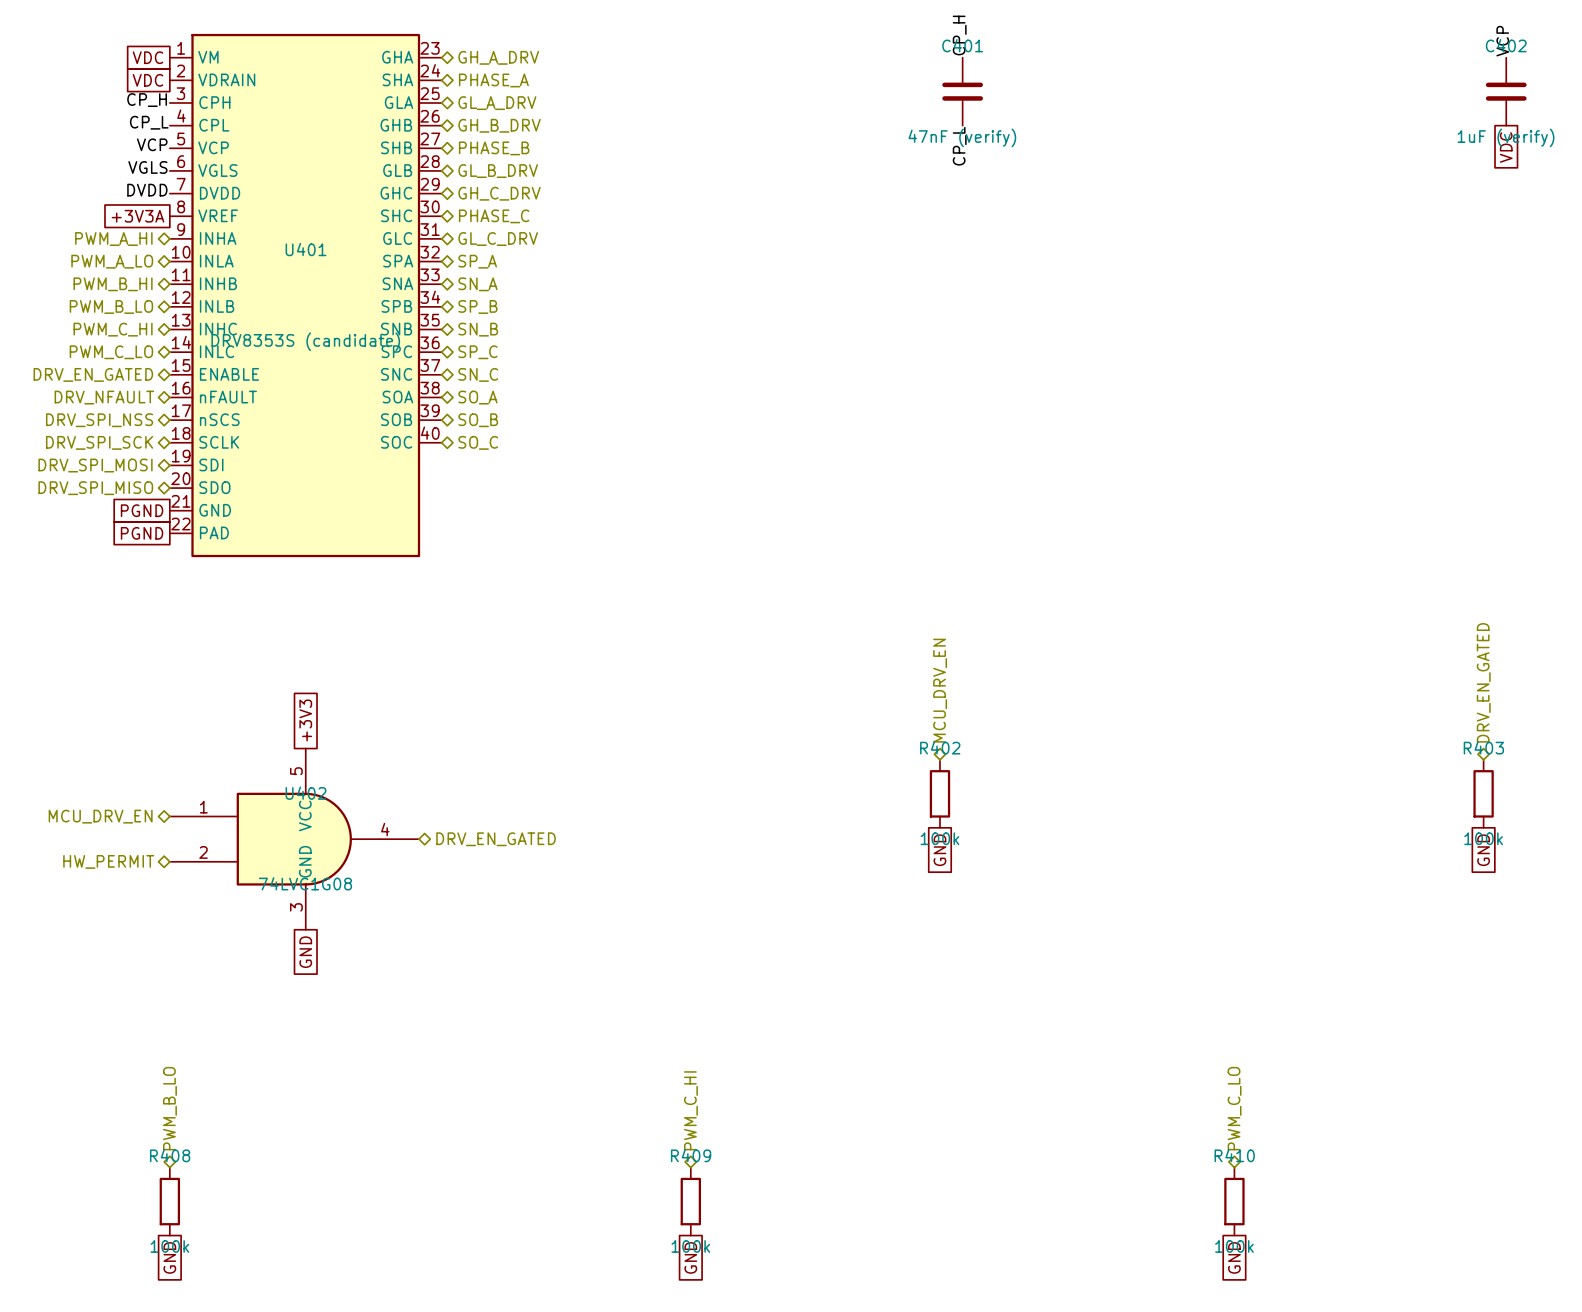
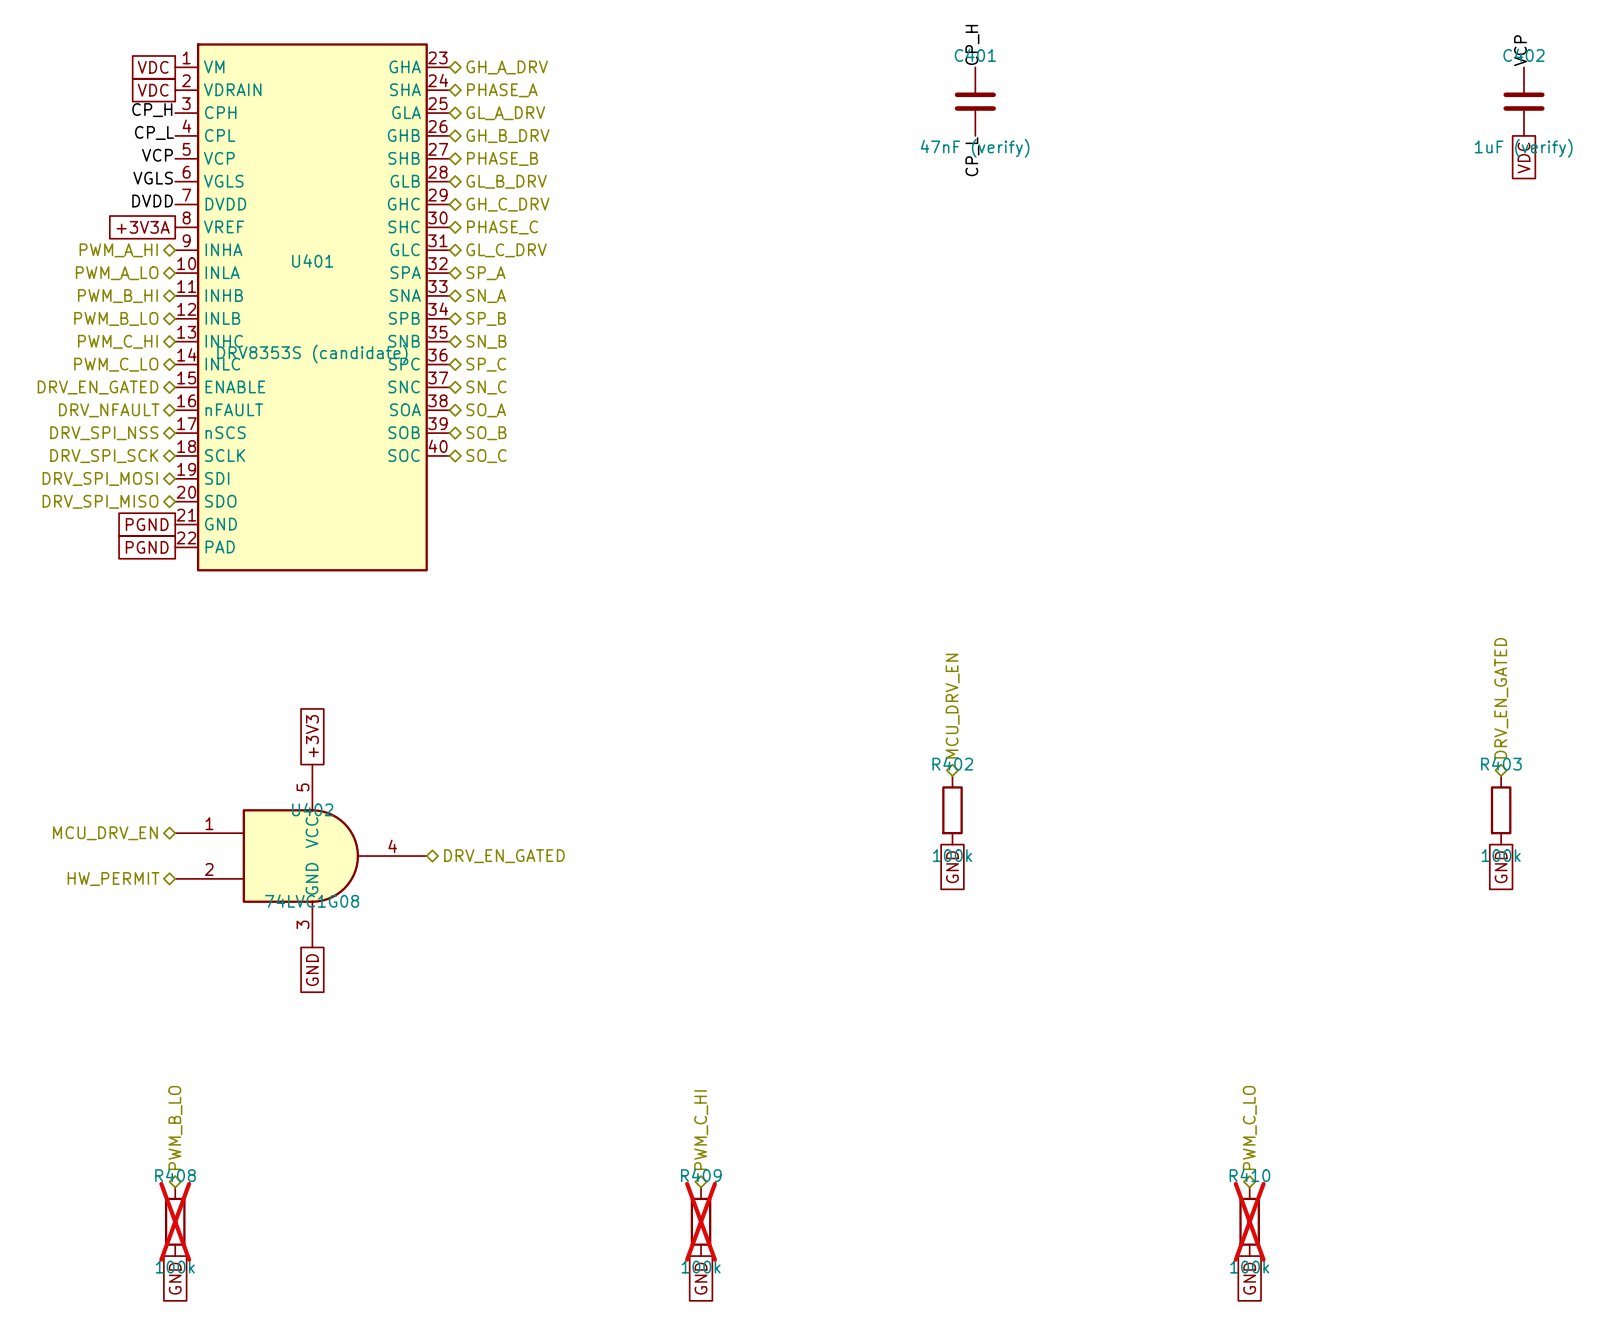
R408 do-not-place cross: none -> (175, 1221)
R409 do-not-place cross: none -> (701, 1221)
R410 do-not-place cross: none -> (1249, 1221)

